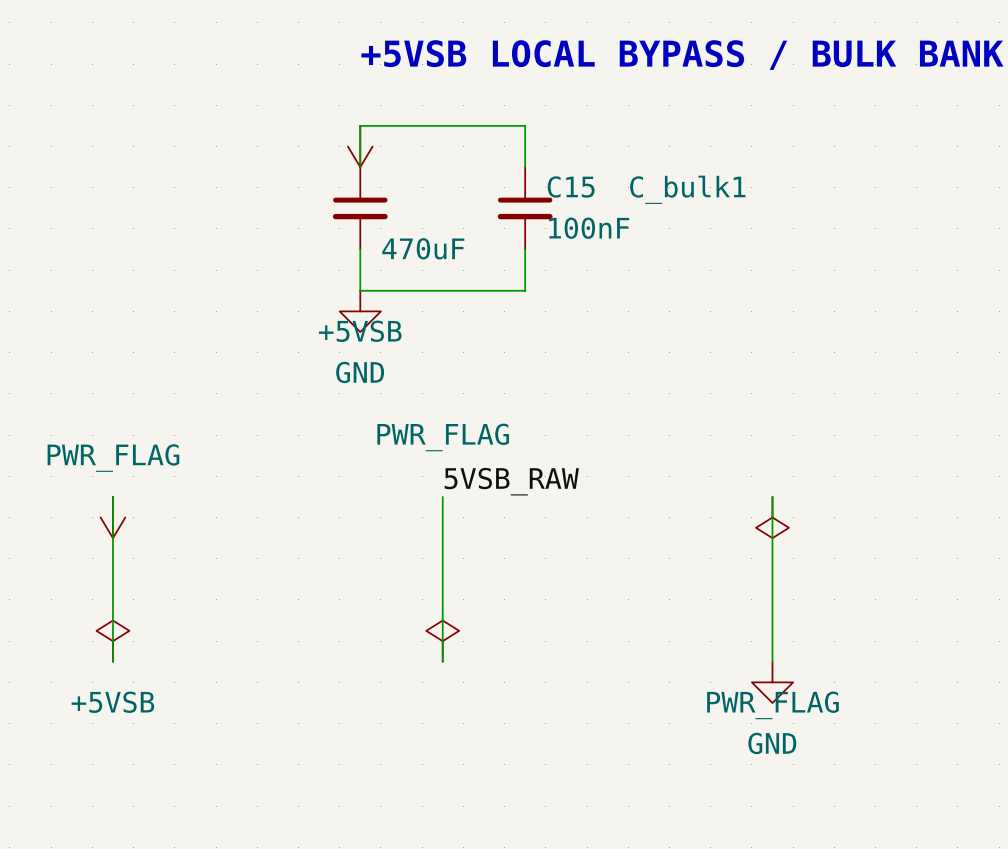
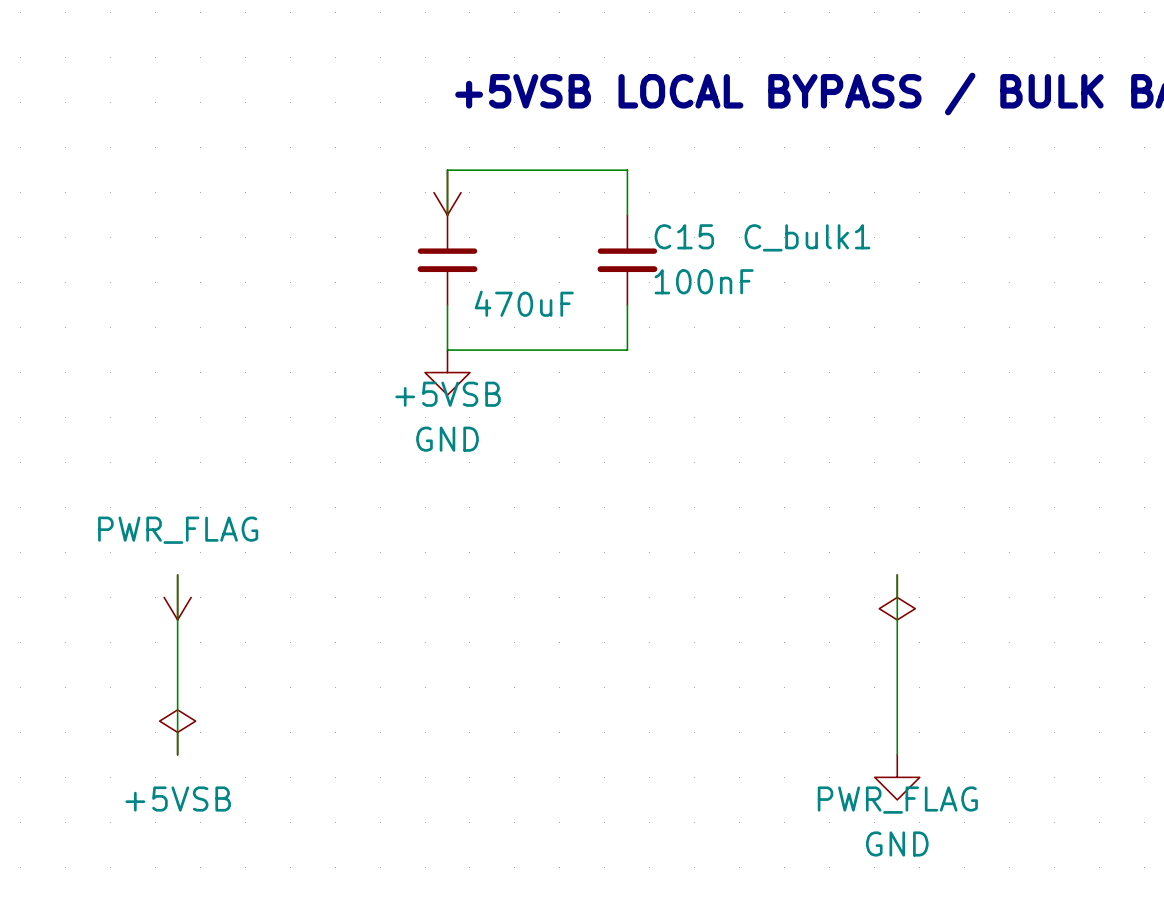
label: 5VSB_RAW (511, 481) -> none
wire: (442, 496) (442, 661) -> none
power symbol: PWR_FLAG (442, 641) -> none

